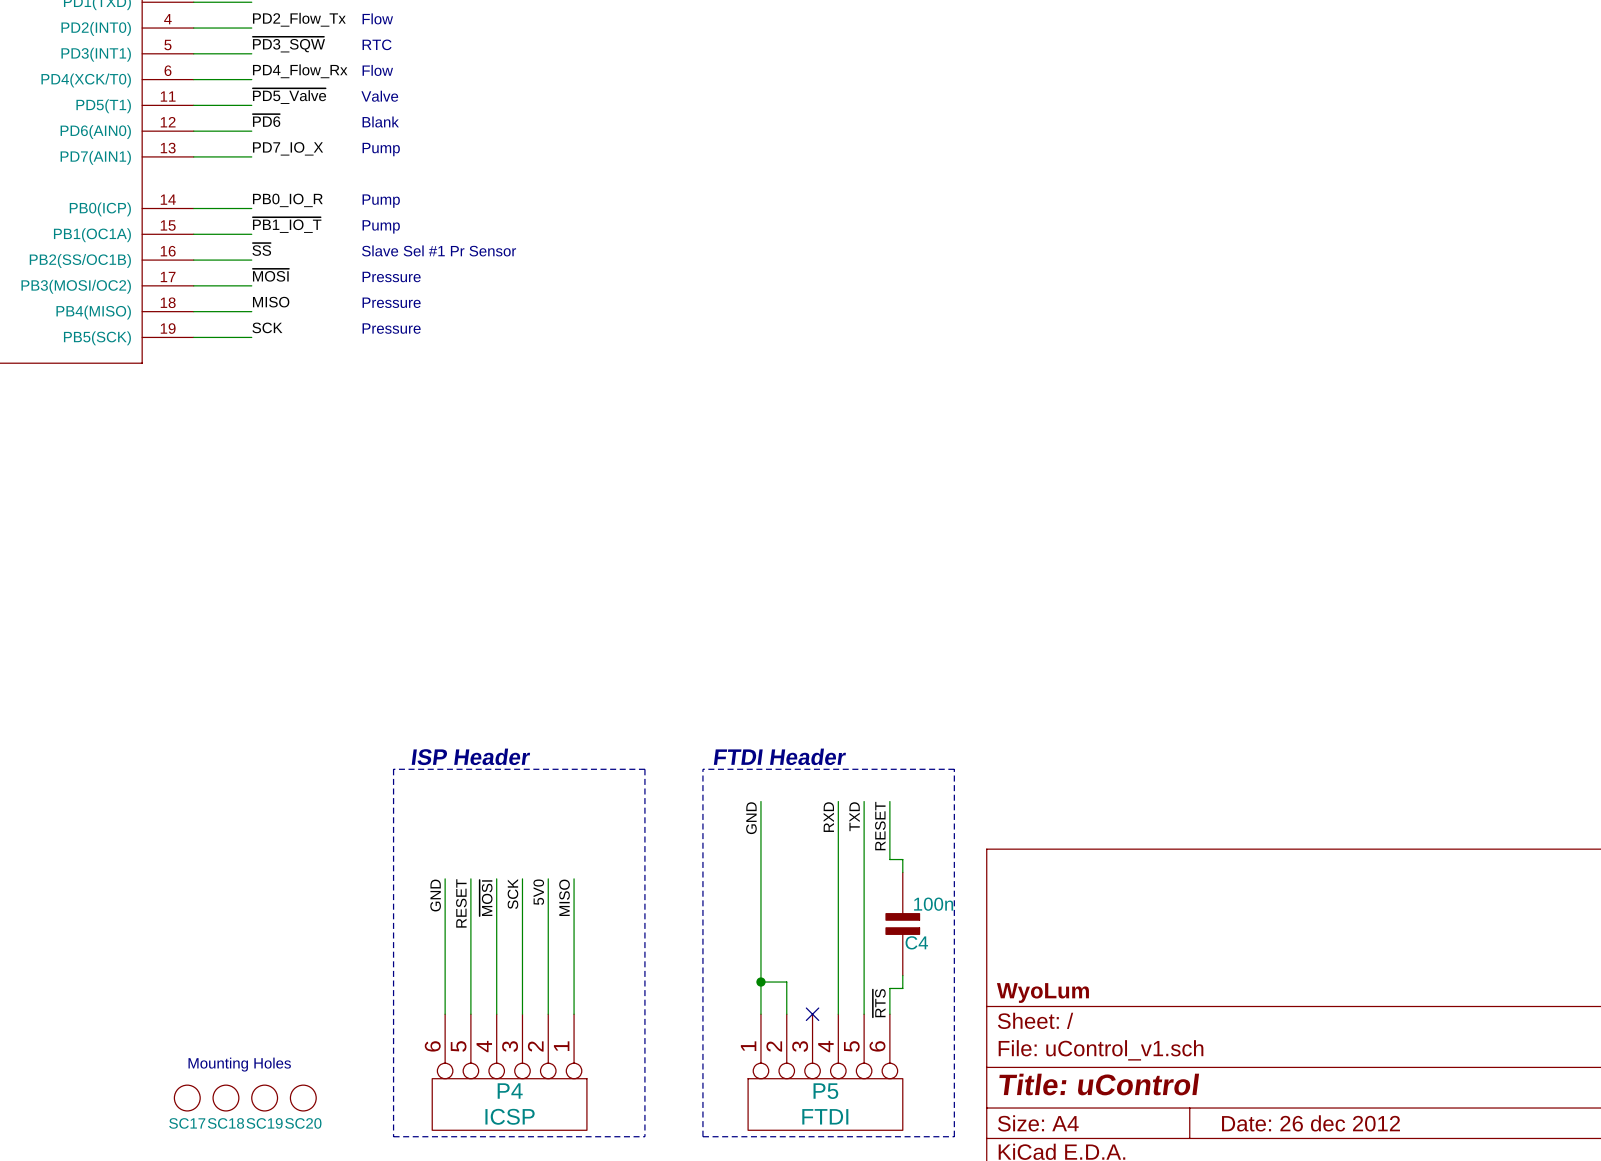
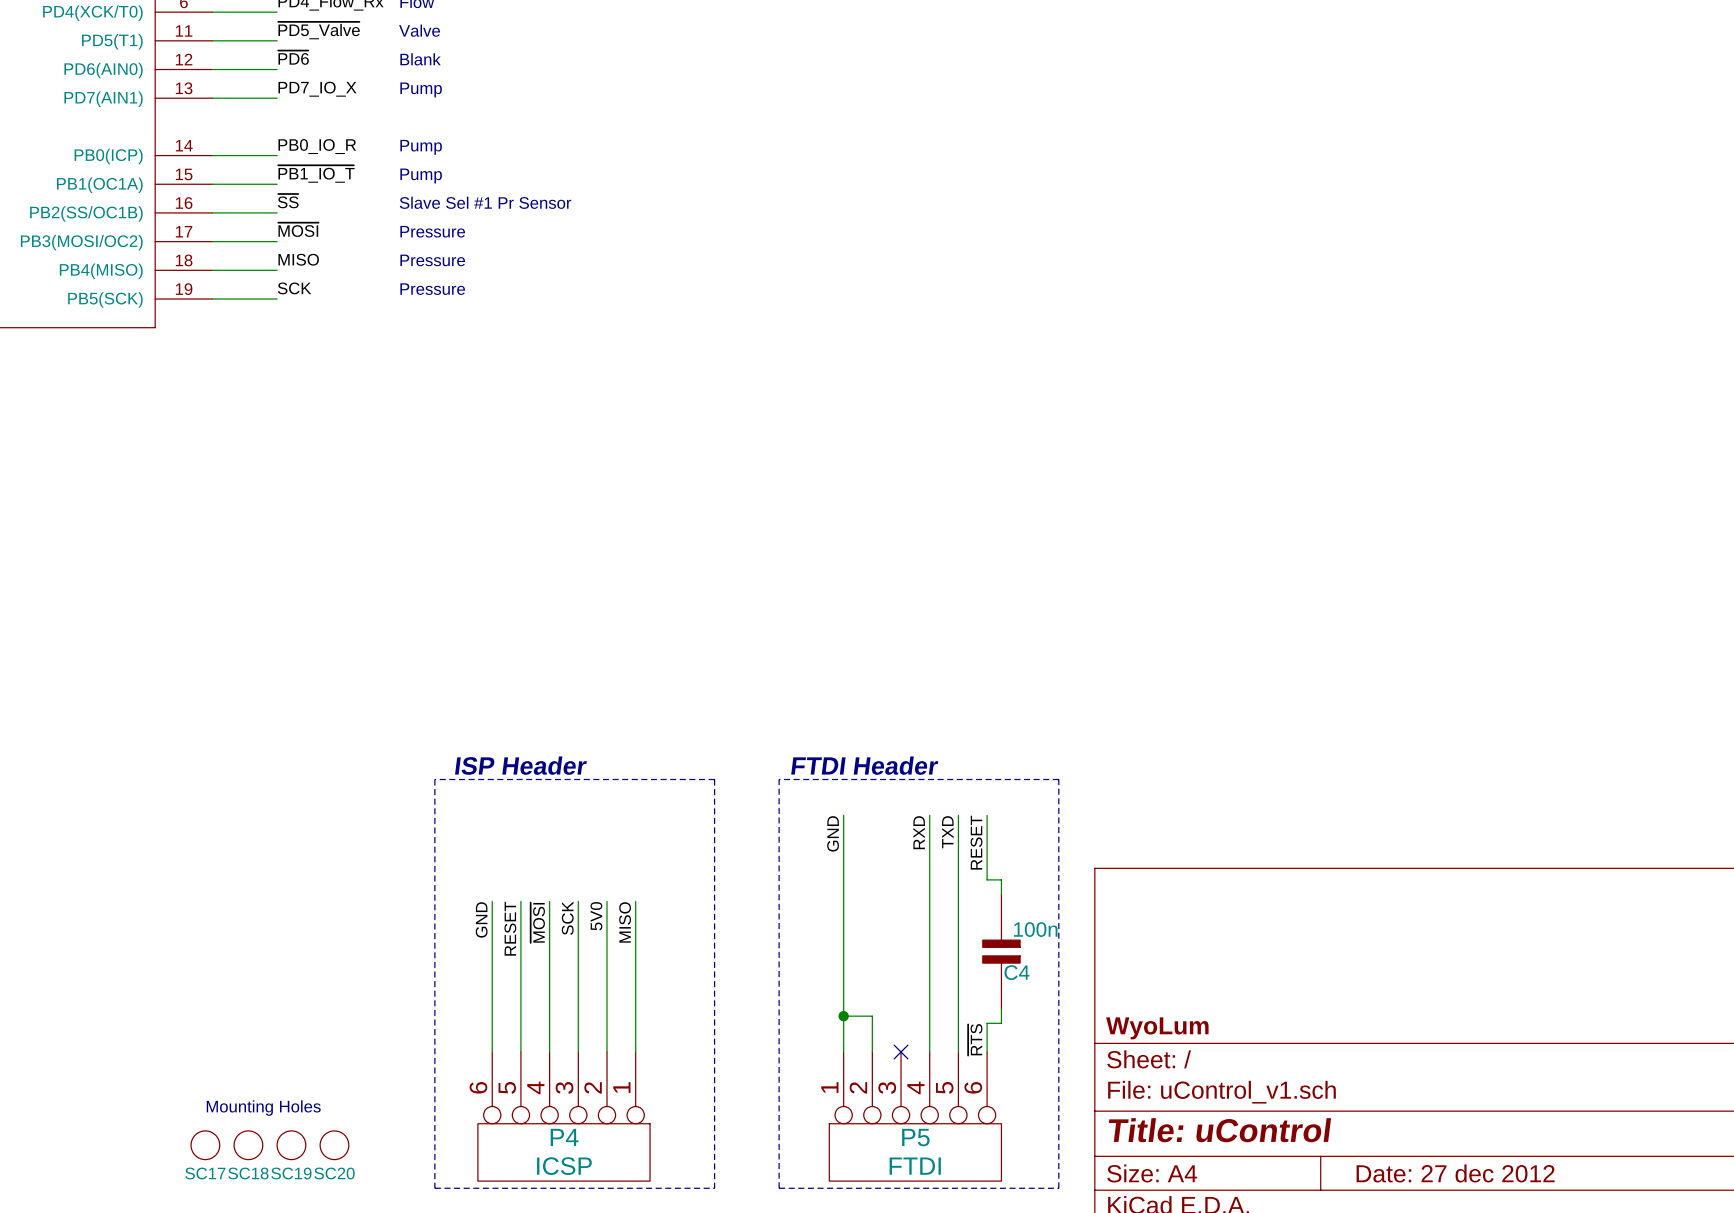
title block: Date: 26 dec 2012 (1311, 1123) -> Date: 27 dec 2012 (1455, 1173)

